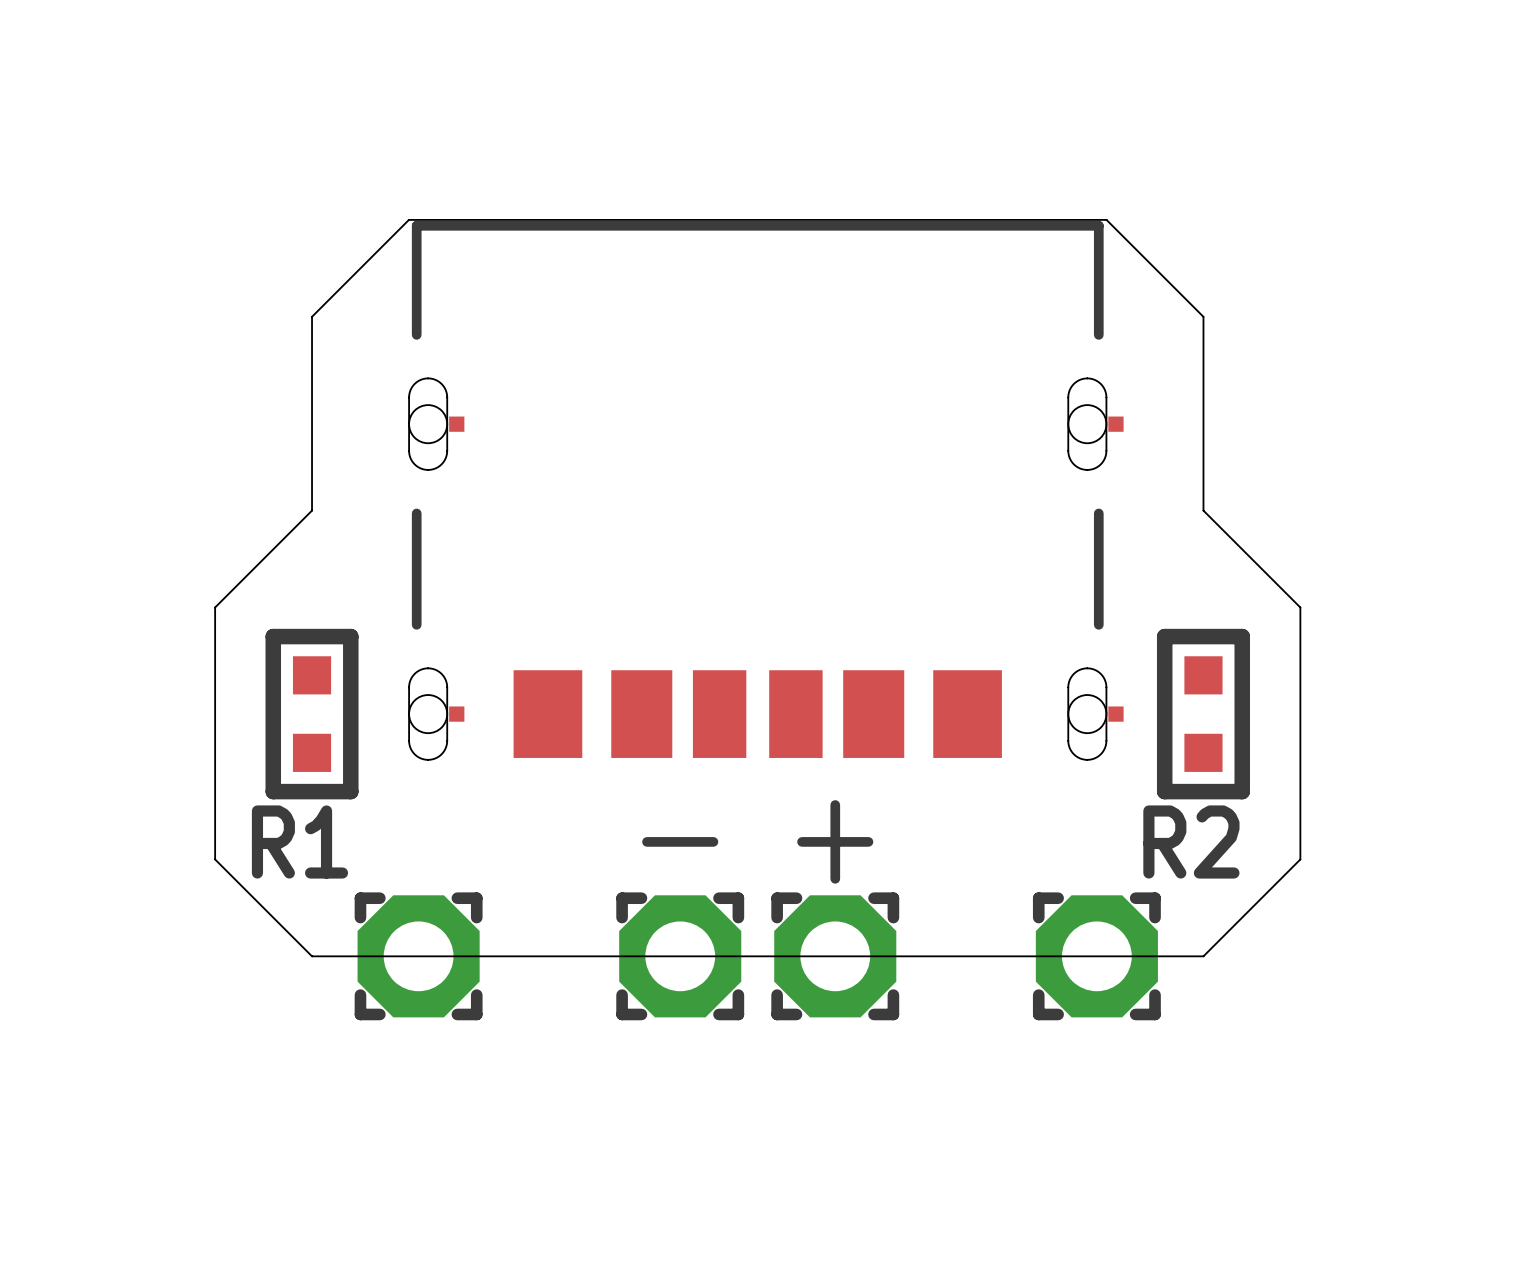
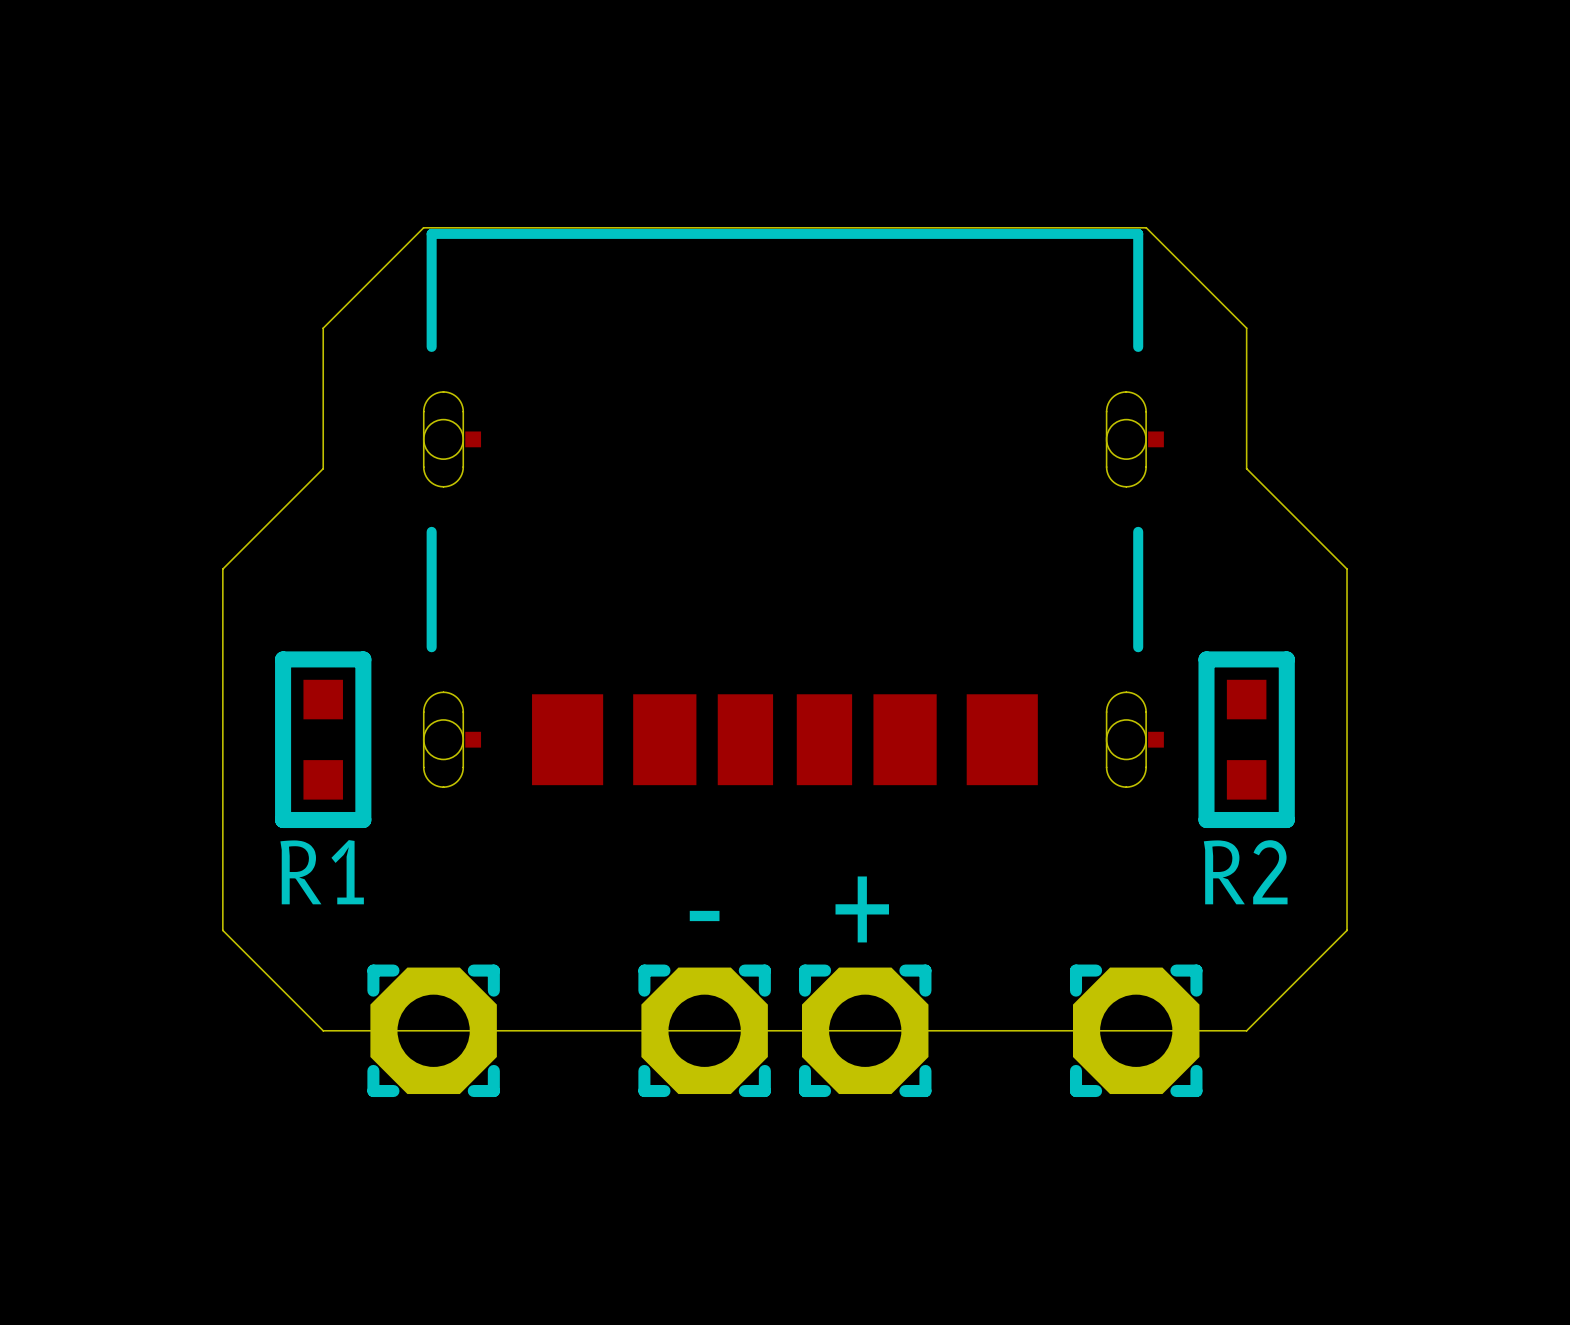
board edge: (312, 452) (312, 510) (215, 607) -> (323, 468) (222, 569) (222, 629)
board edge: (1203, 452) (1203, 510) (1300, 607) -> (1246, 468) (1347, 569) (1347, 629)
board edge: (215, 859) (312, 956) (1203, 956) (1300, 859) -> (222, 890) (222, 930) (323, 1030) (1246, 1030) (1347, 930) (1347, 890)
part position: (418, 956) -> (433, 1030)
part position: (680, 956) -> (704, 1030)
part position: (835, 956) -> (865, 1030)
part position: (1096, 956) -> (1136, 1030)

